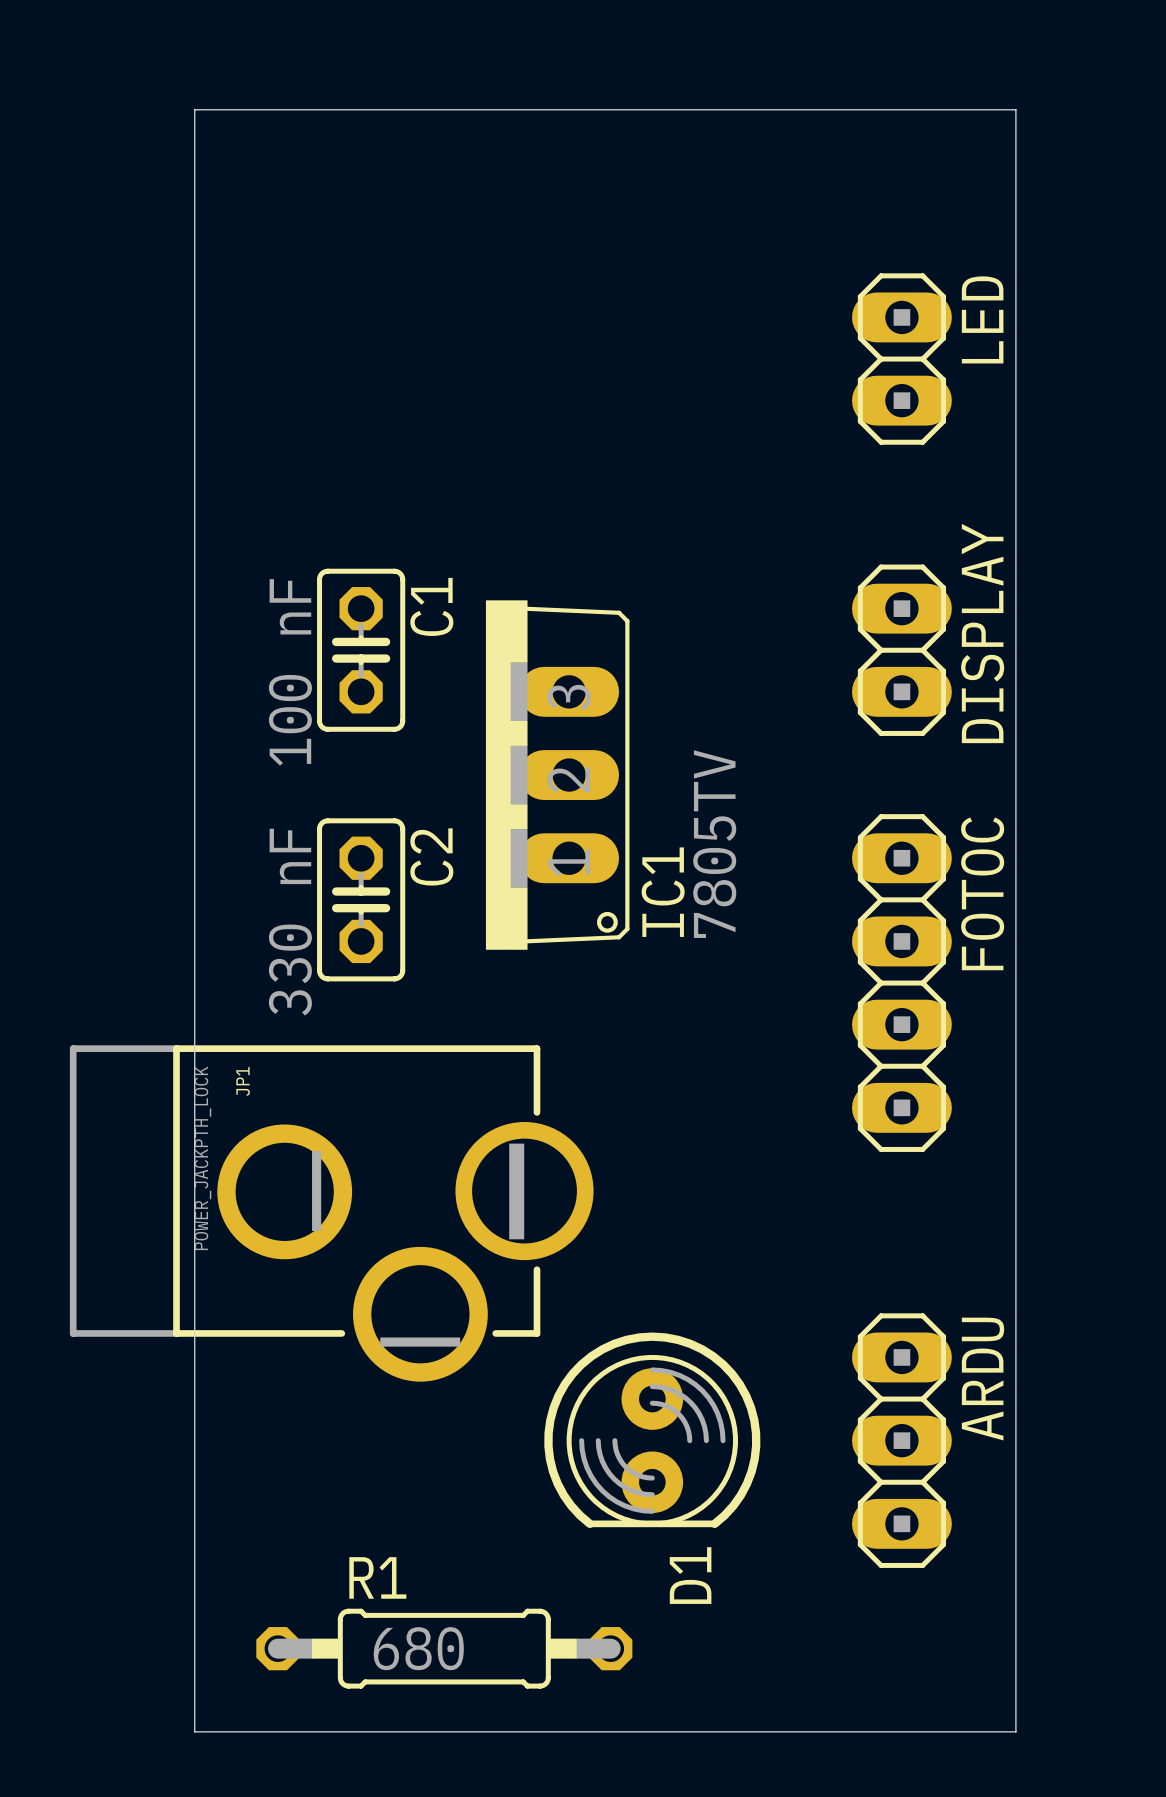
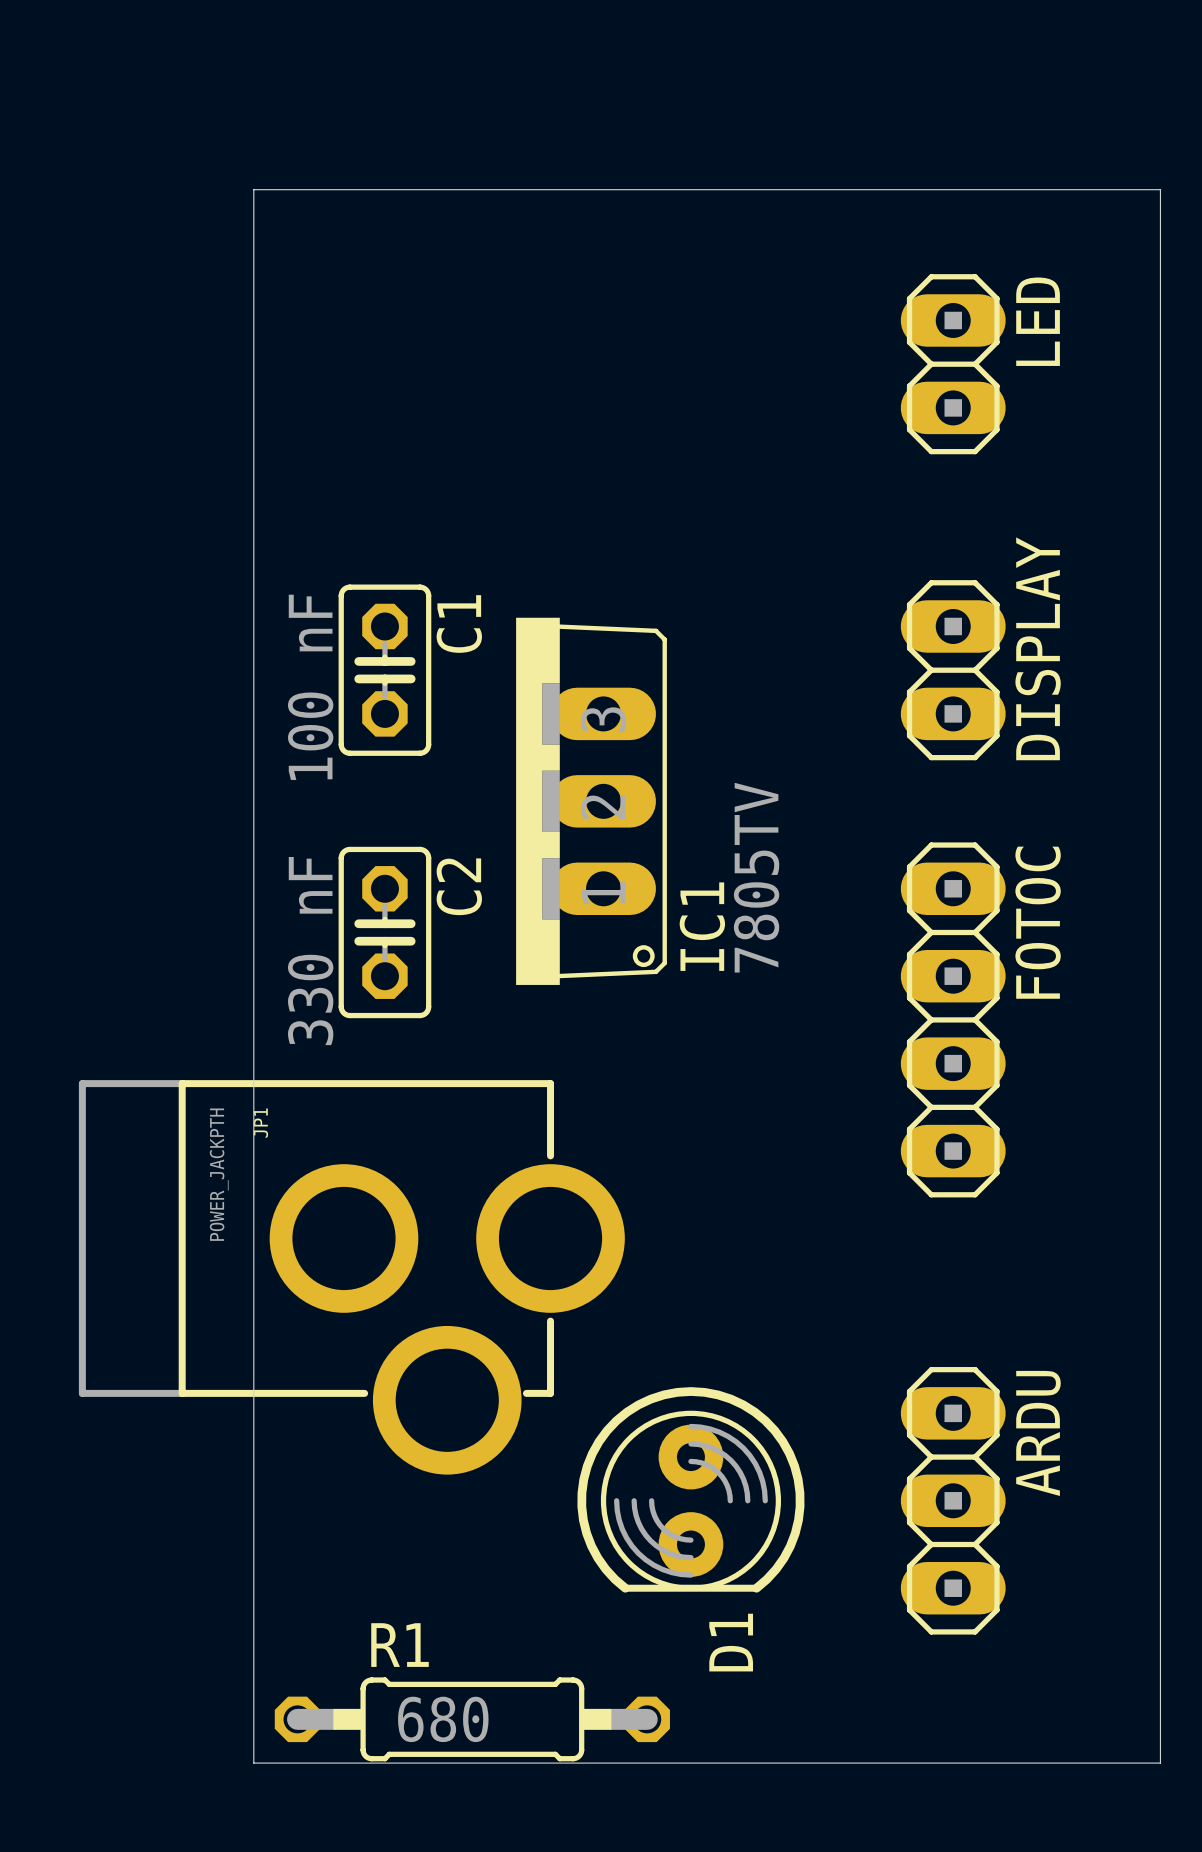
board edge: (194, 109) (1015, 109) (1015, 1731) (194, 1731) (194, 109) -> (253, 189) (253, 1763) (1160, 1763) (1160, 189) (253, 189)
JP1 footprint: [69, 1045, 594, 1382] -> [78, 1080, 625, 1475]
JP1 value: POWER_JACKPTH_LOCK (202, 1158) -> POWER_JACKPTH (219, 1174)

